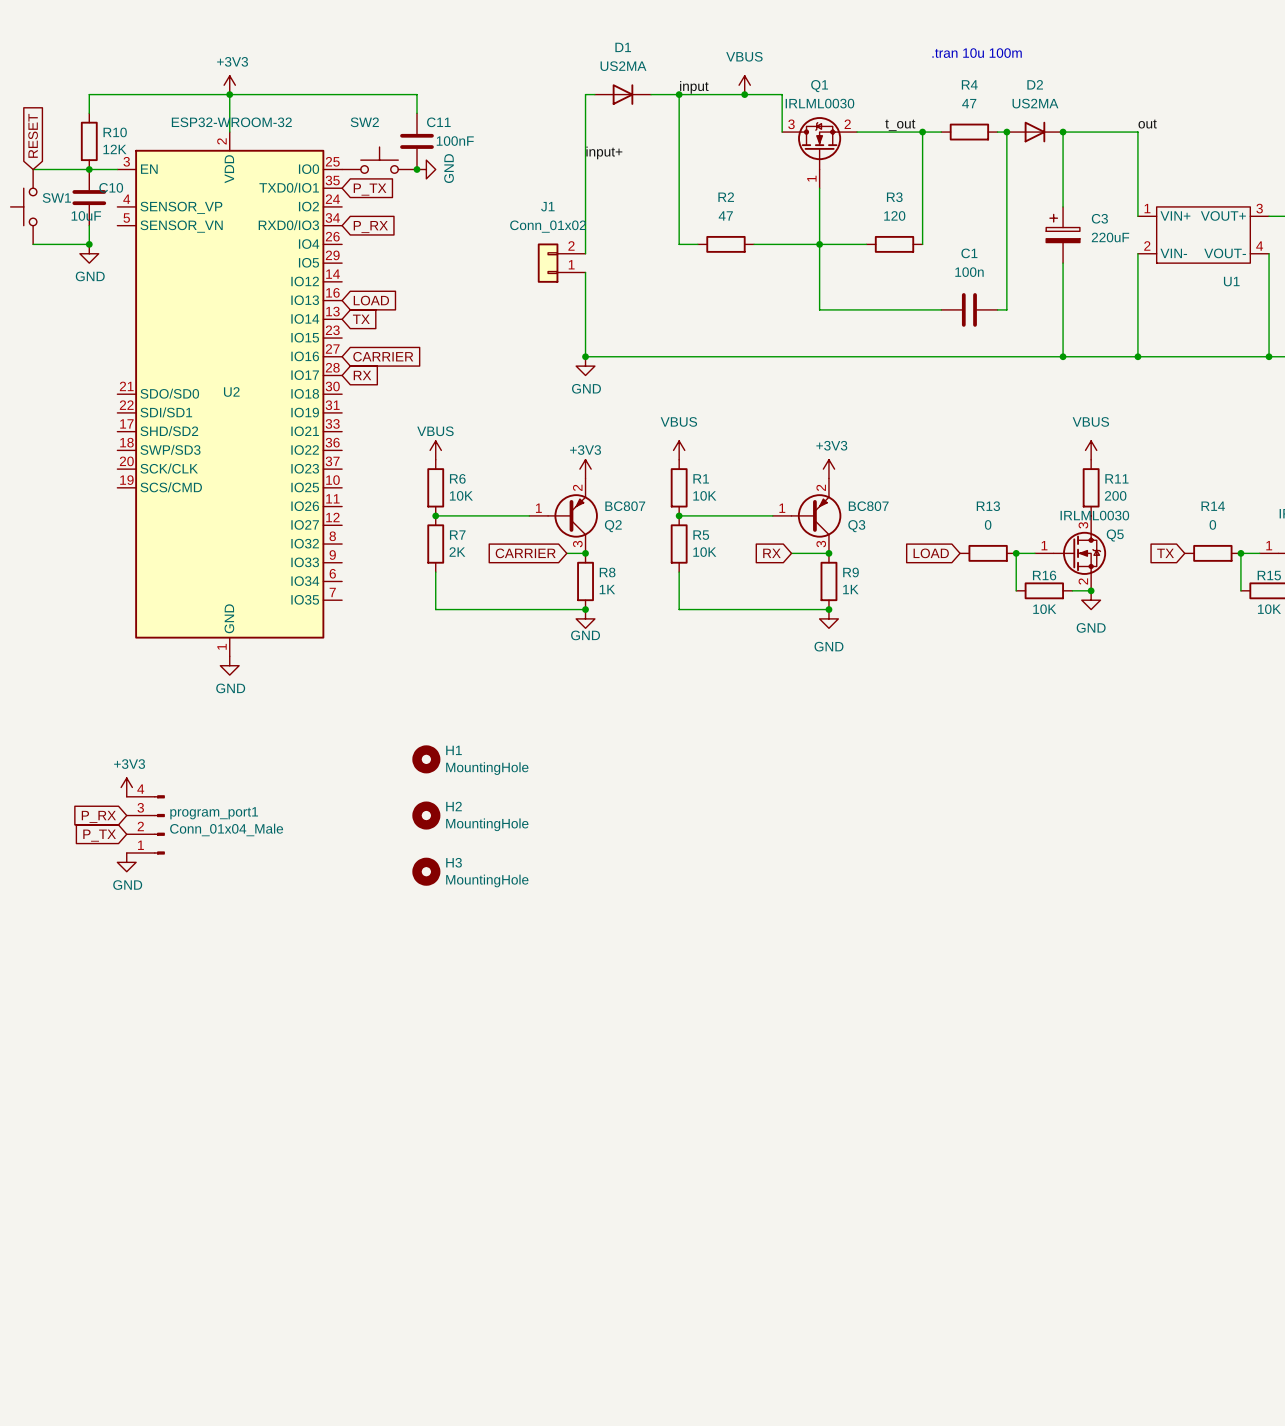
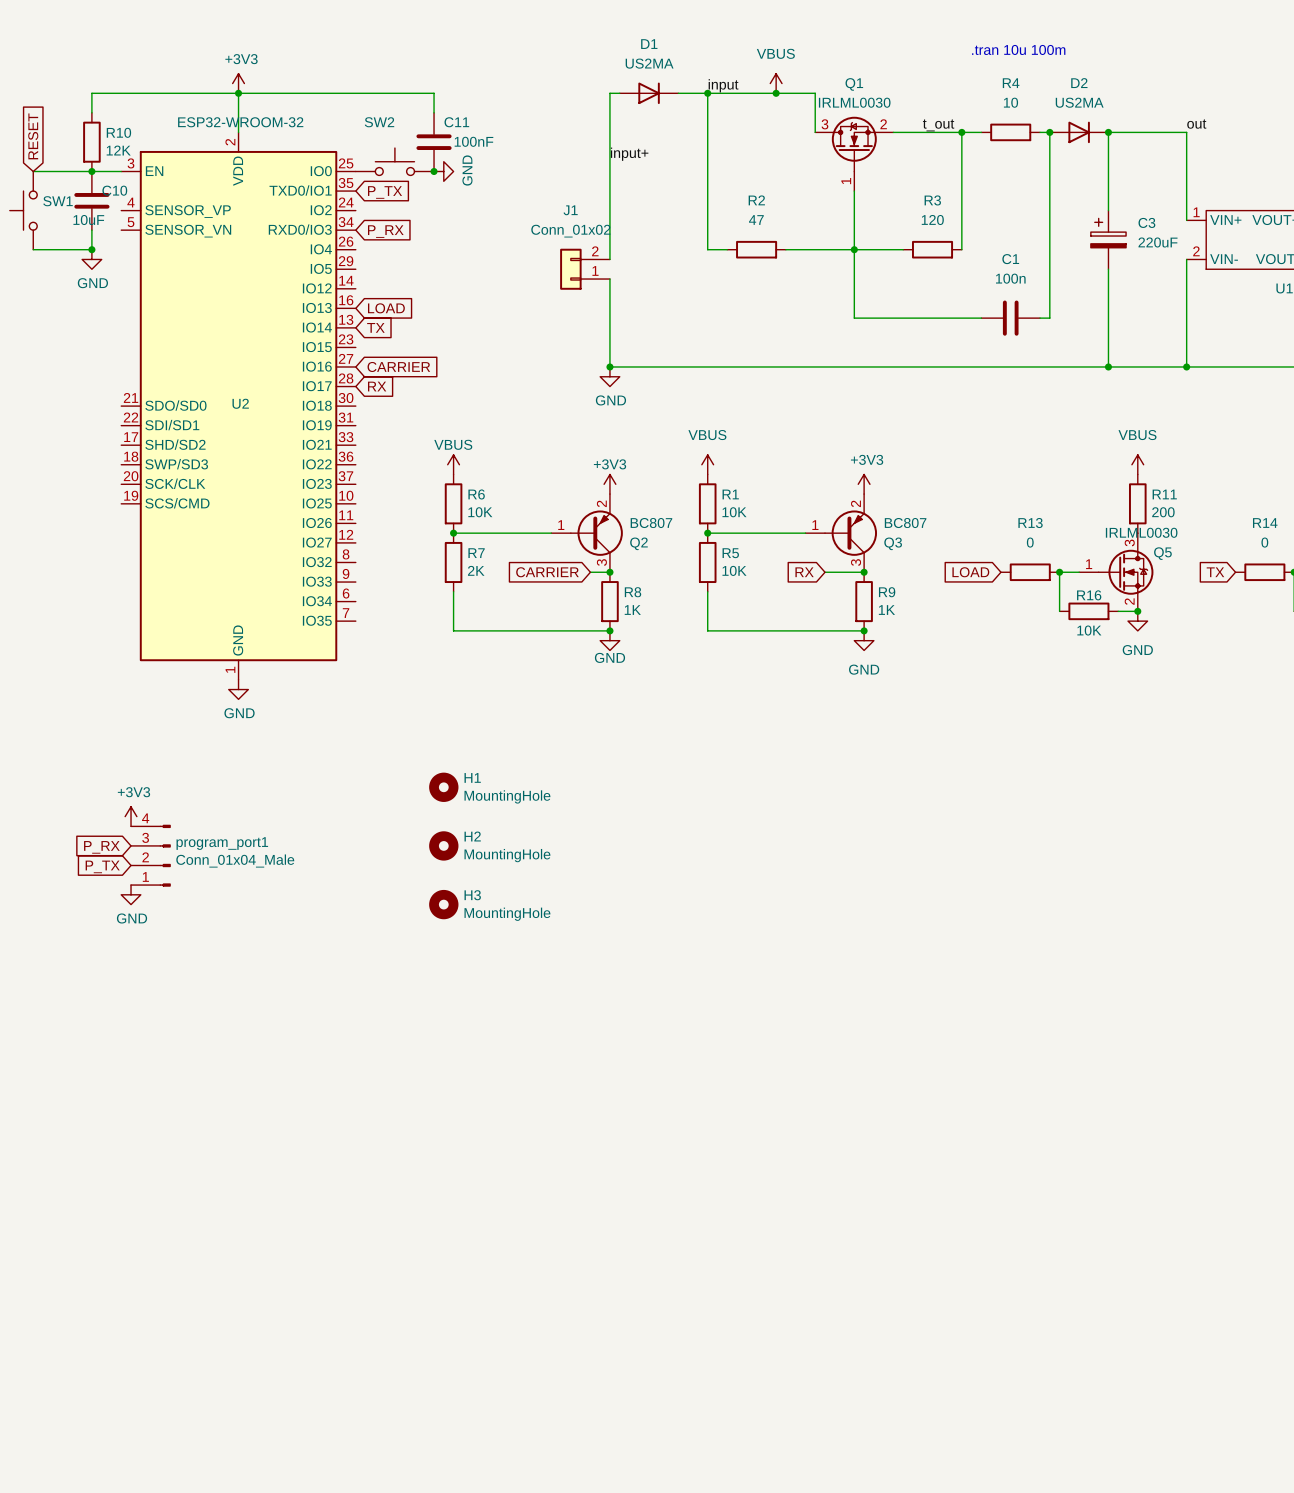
R4 value: 47 (969, 103) -> 10 (1010, 102)

